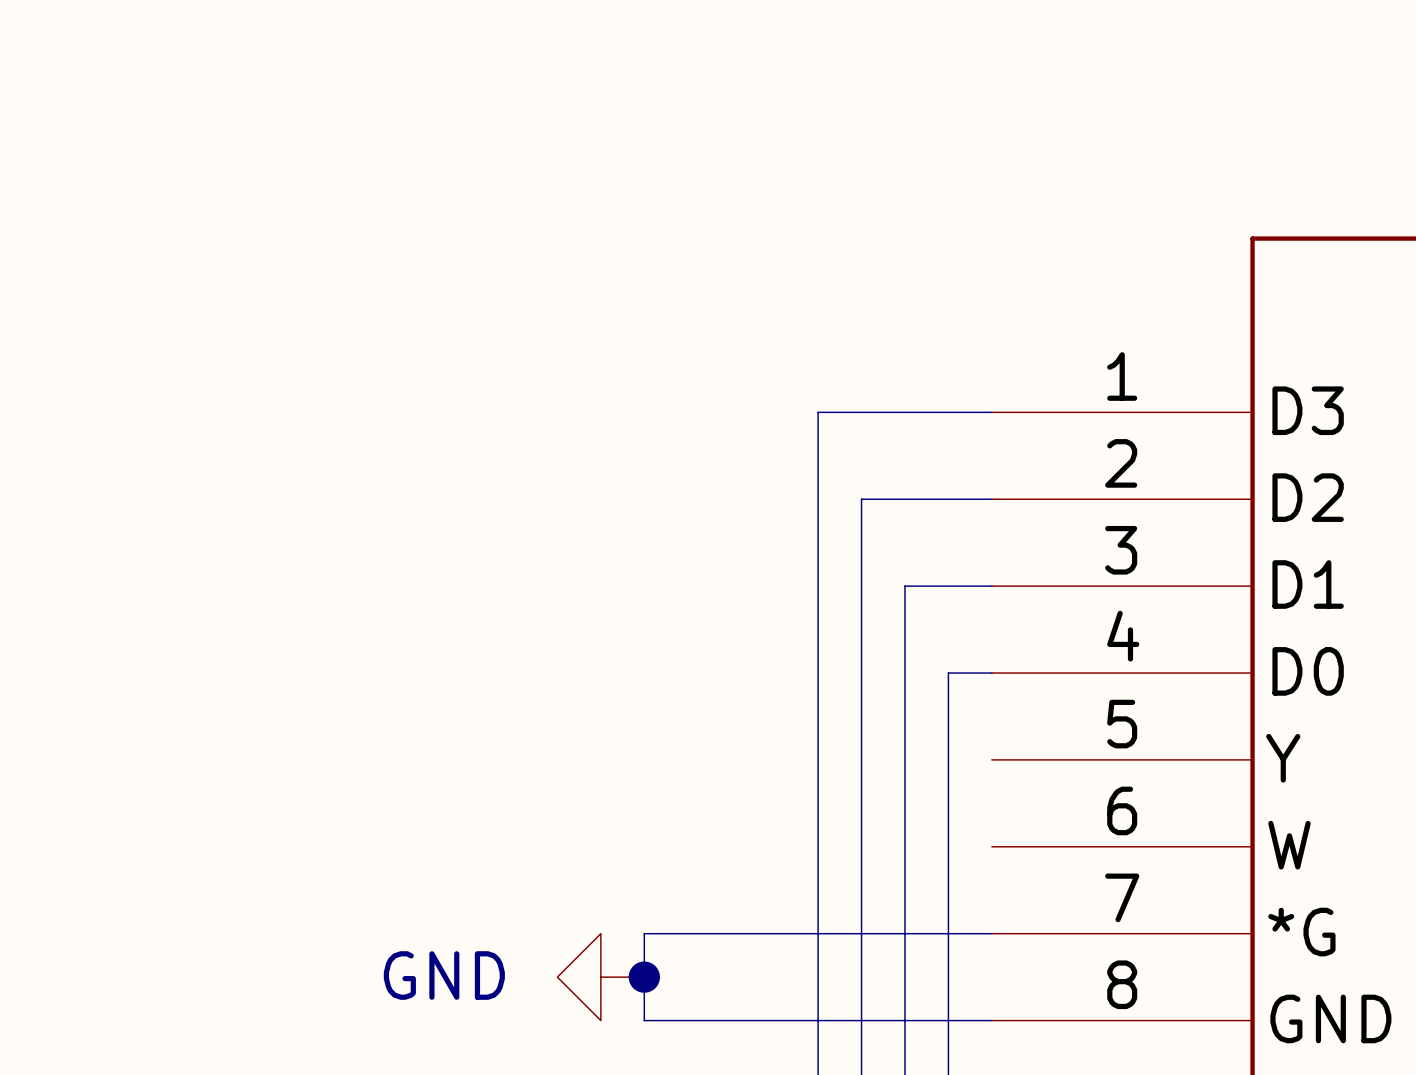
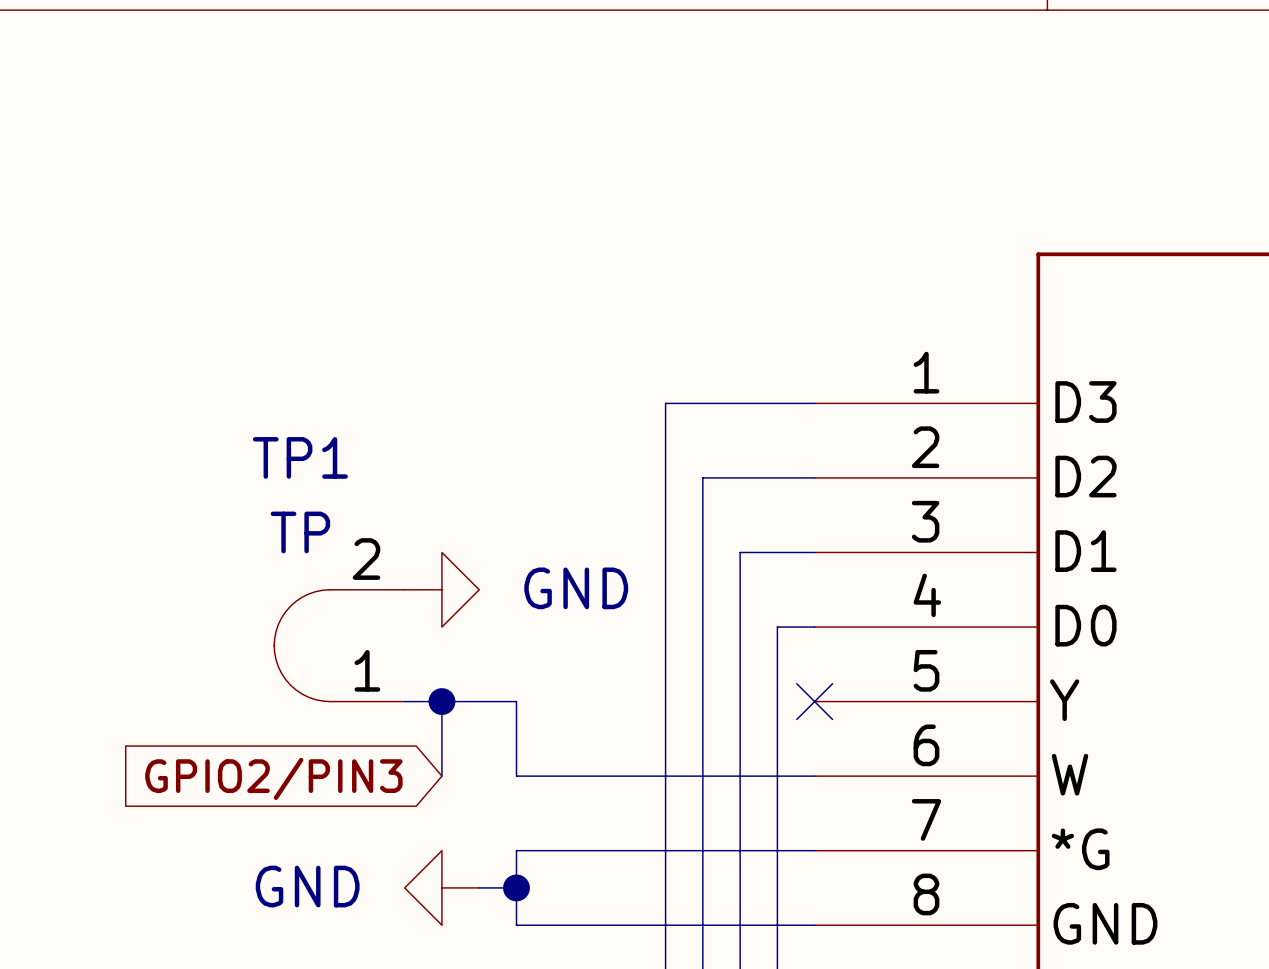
power symbol: none -> GND (441, 589)
TP1: none -> TP (339, 645)
wire: none -> (404, 701) (516, 701) (516, 776) (814, 776)
wire: none -> (441, 701) (441, 776)
junction: none -> (441, 701)
no-connect mark: none -> (814, 701)
global label: none -> GPIO2/PIN3 (273, 778)
power symbol position: GND (600, 977) -> GND (441, 887)

